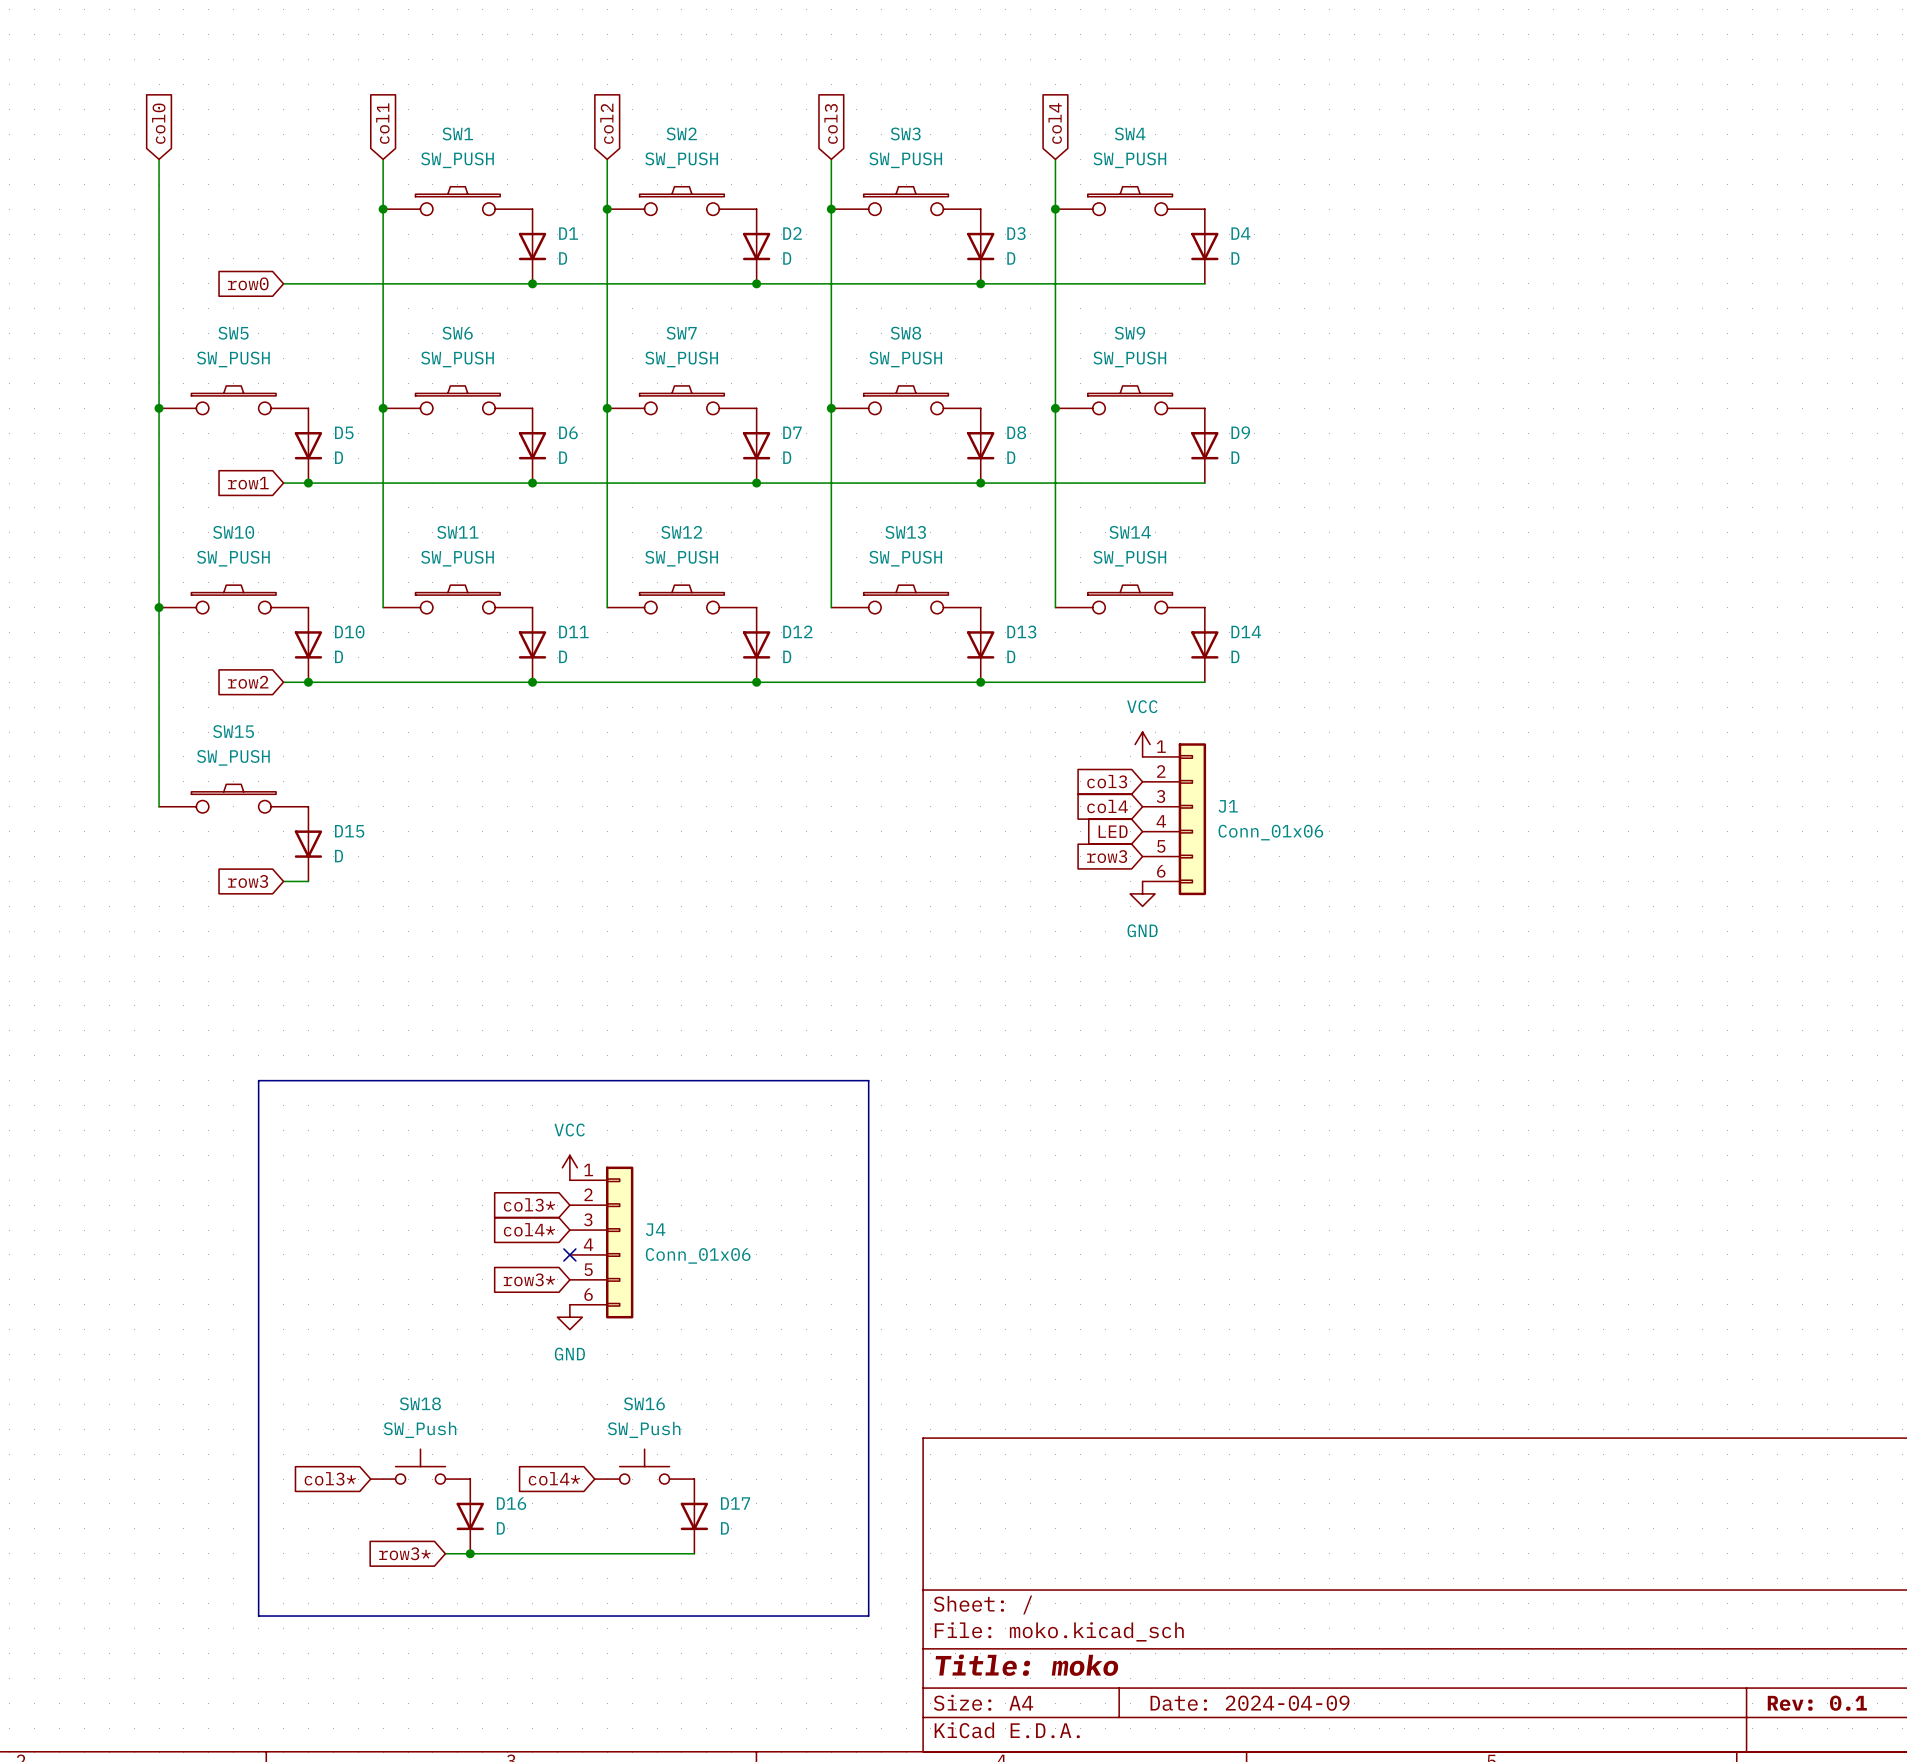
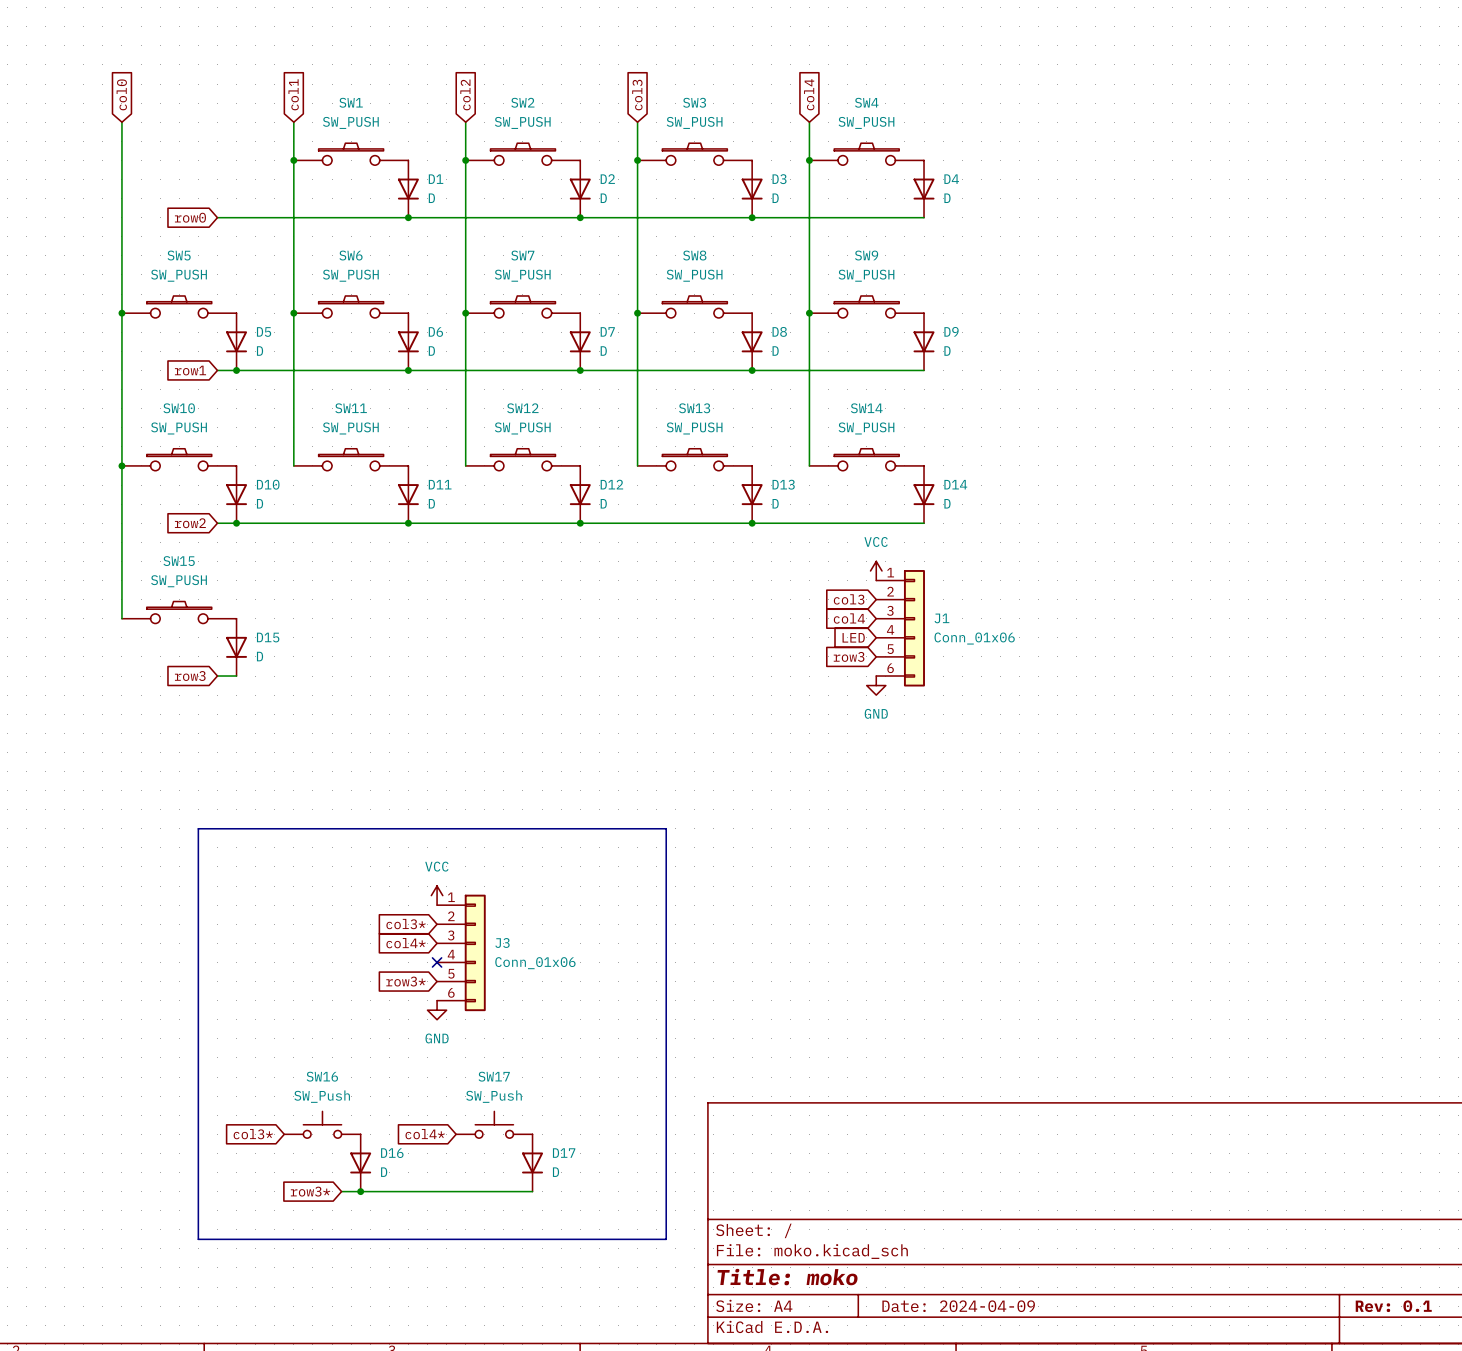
J4 name: J4 (655, 1229) -> J3 (502, 943)
SW18 name: SW18 (420, 1403) -> SW16 (322, 1076)
SW16 name: SW16 (644, 1403) -> SW17 (494, 1076)

